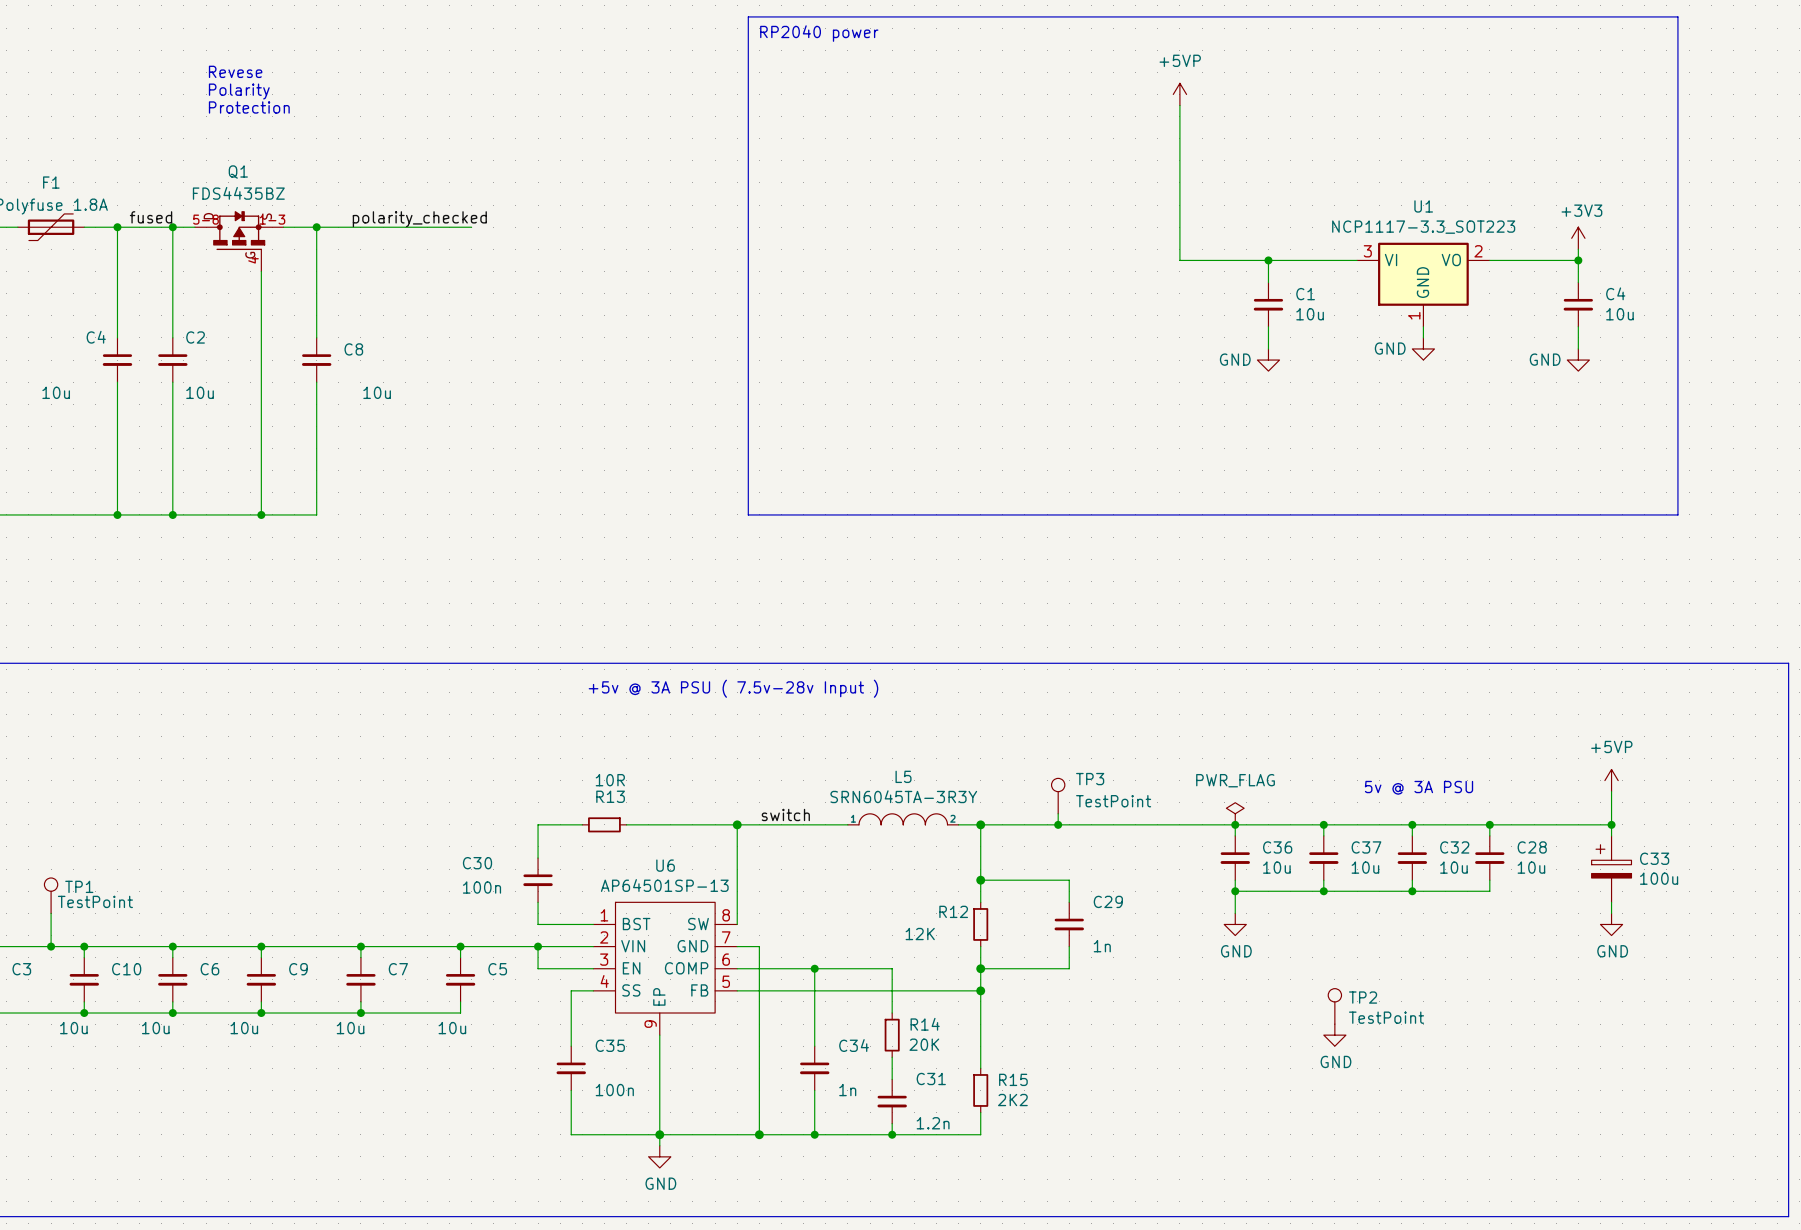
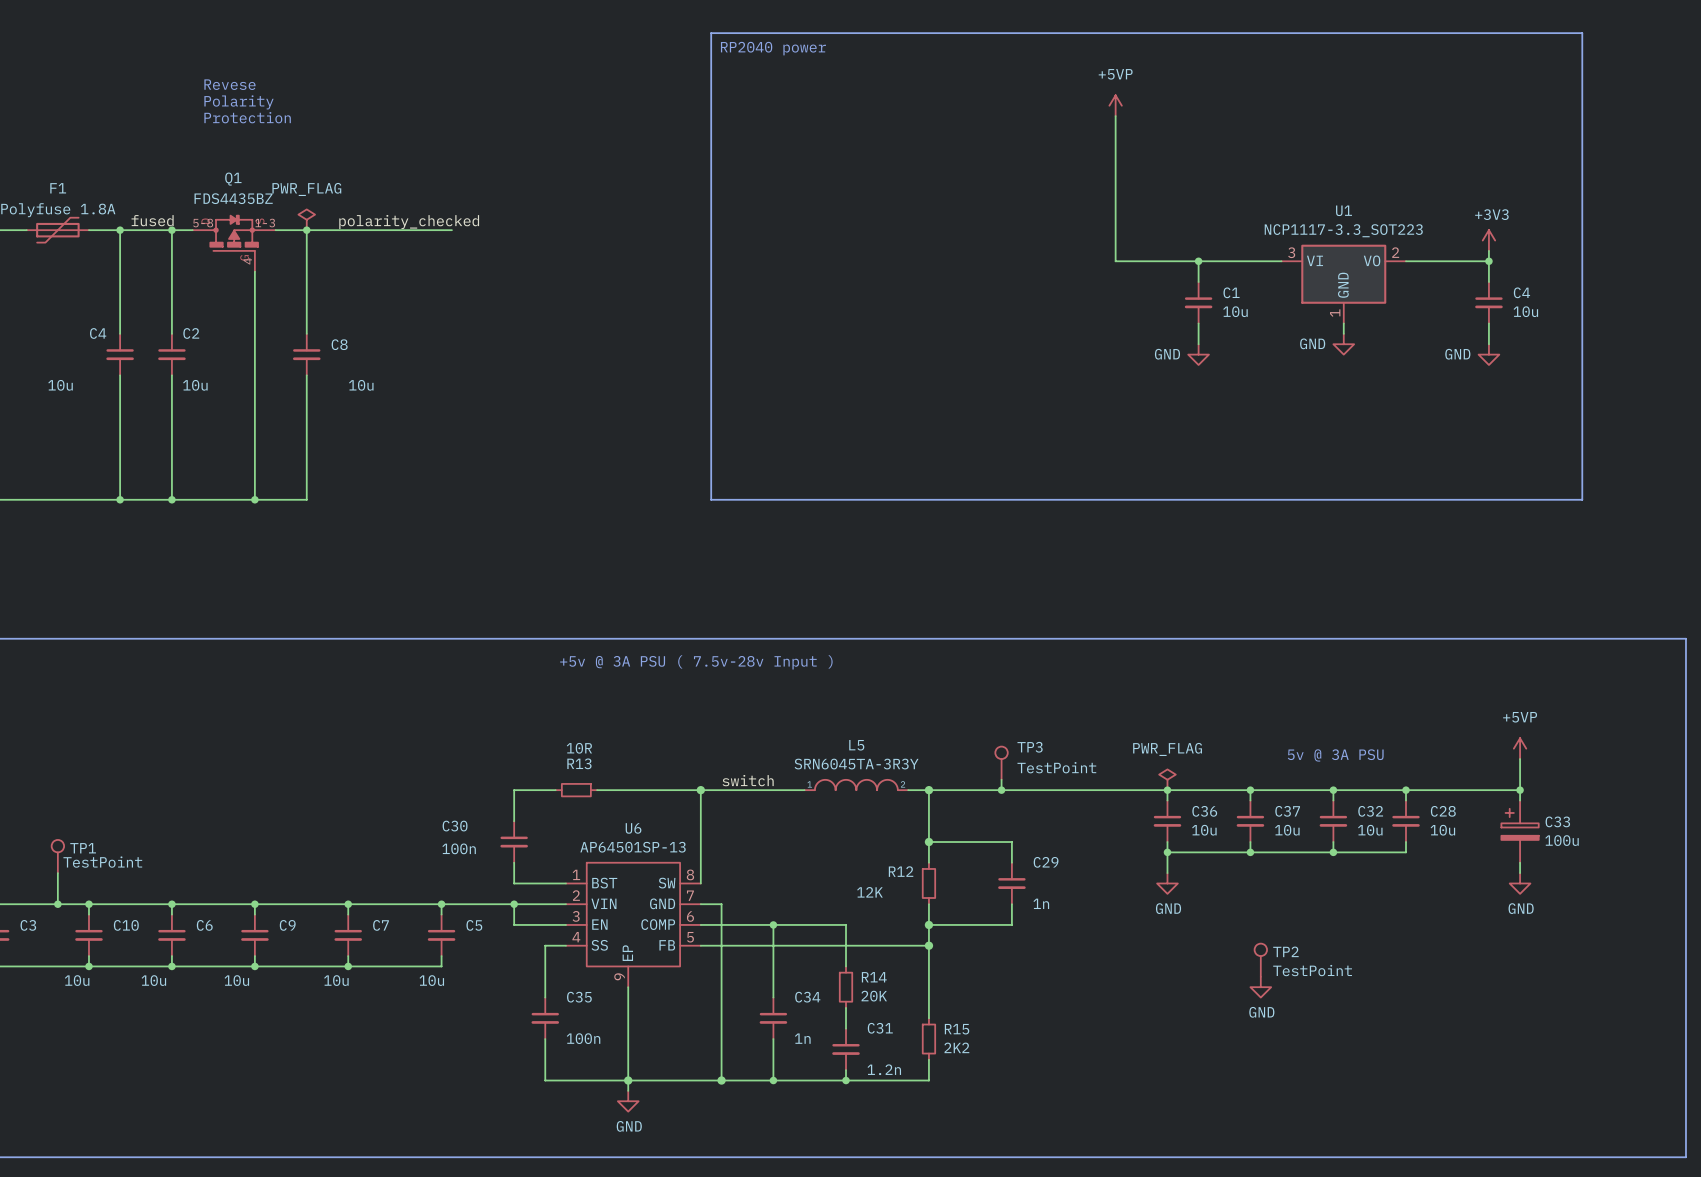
power symbol: none -> PWR_FLAG (306, 219)

